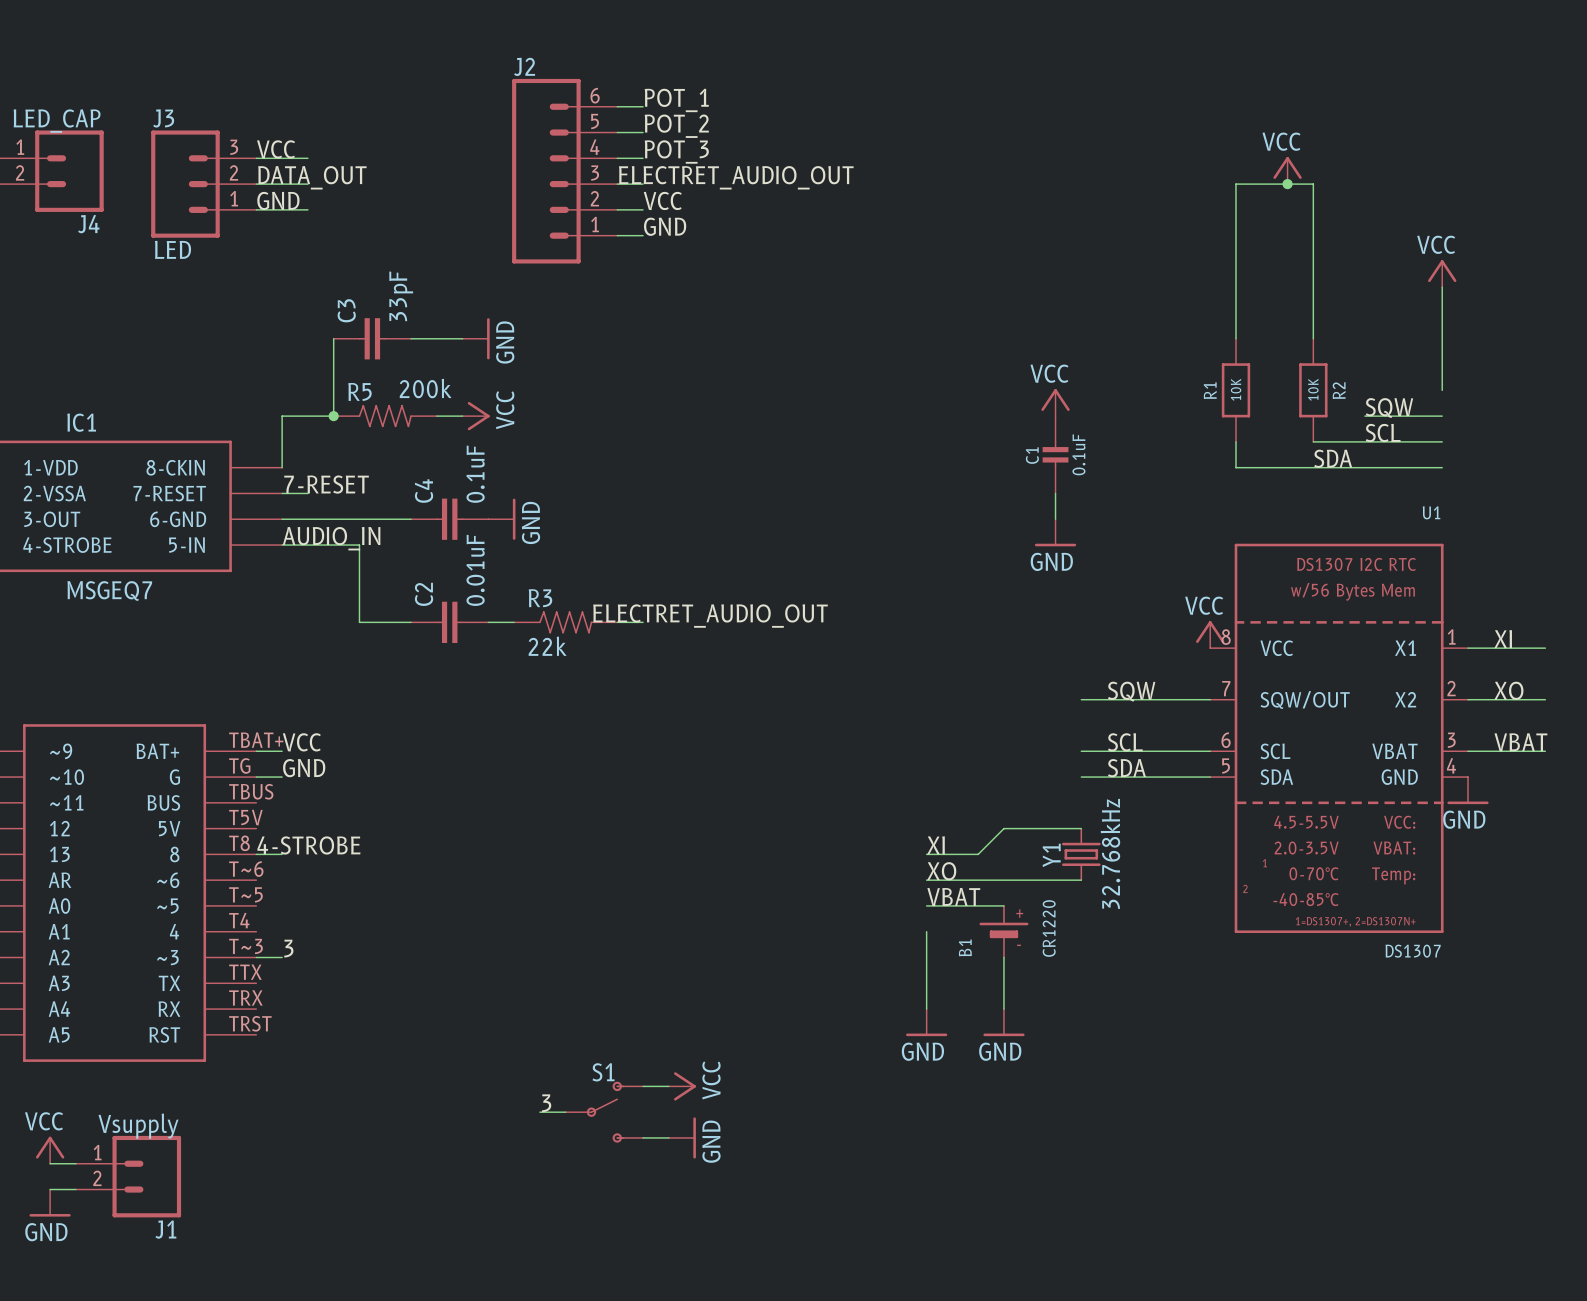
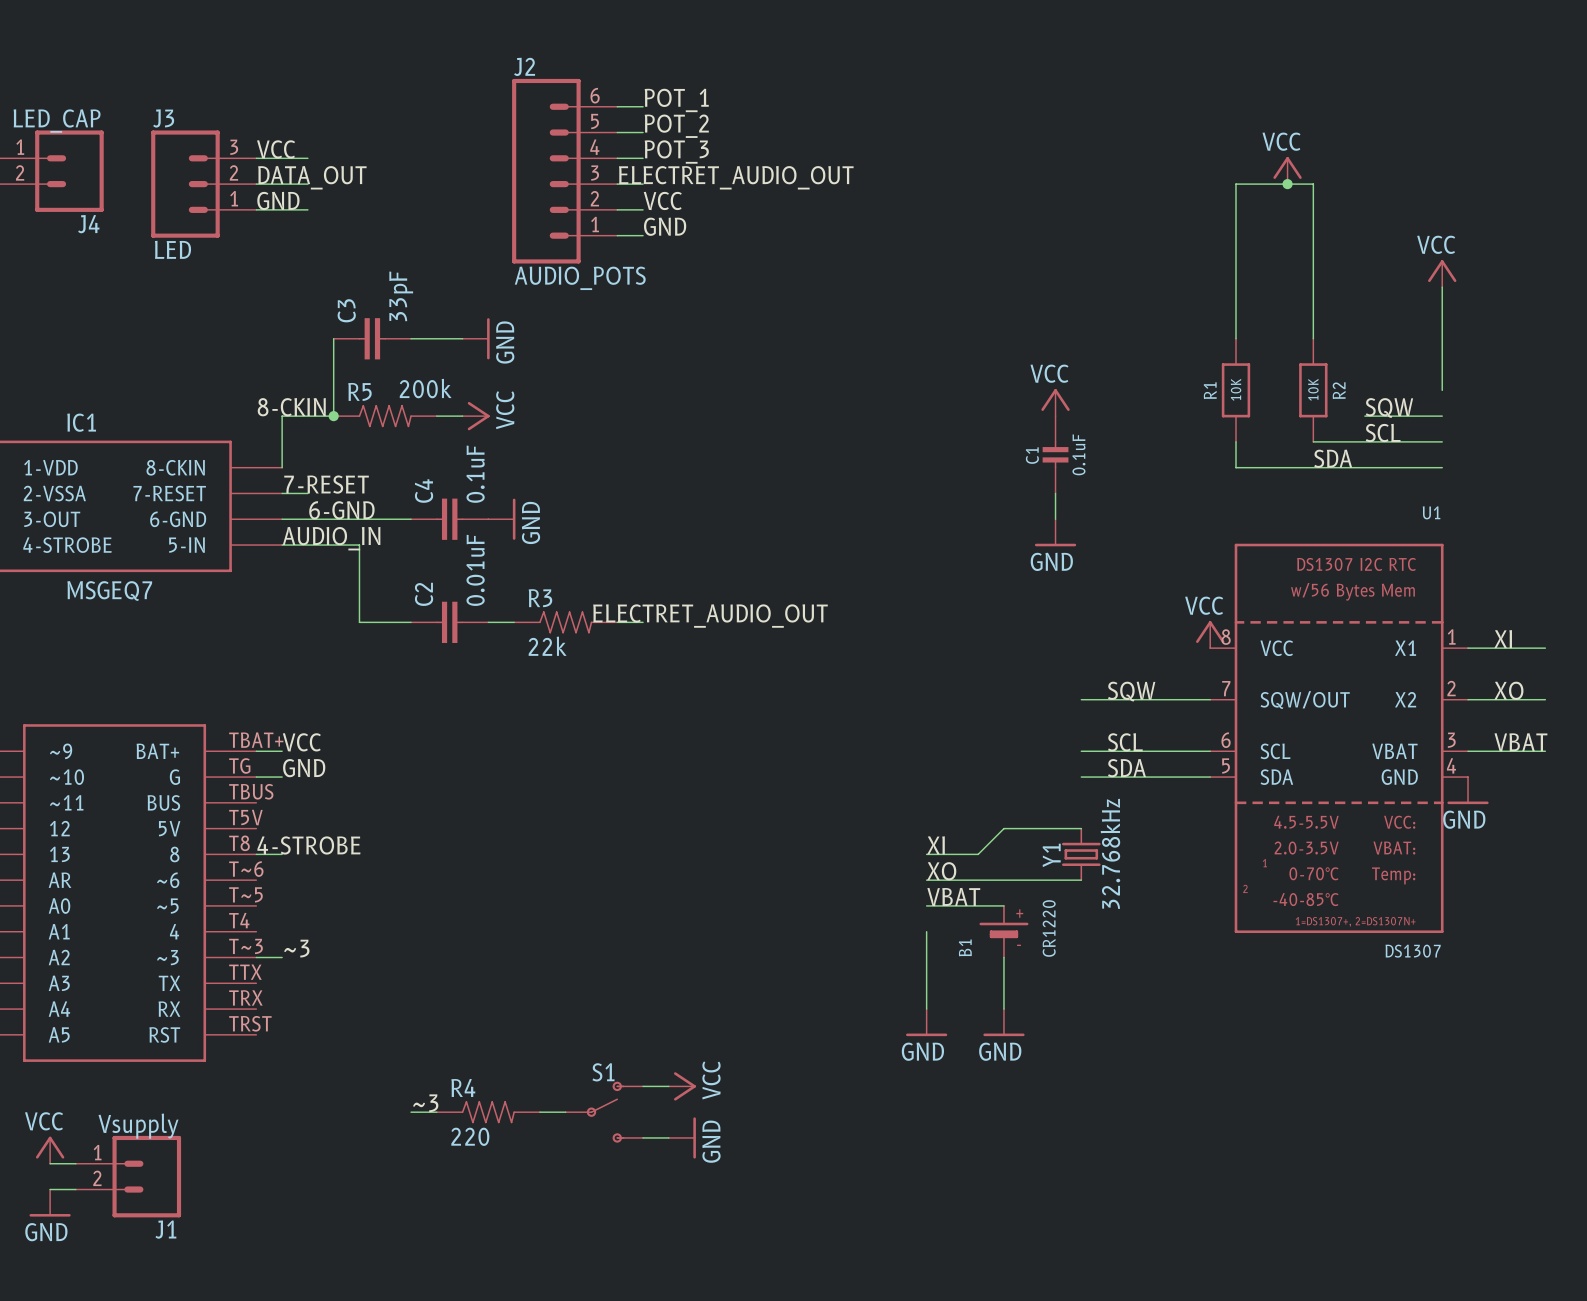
J2 value: none -> AUDIO_POTS (580, 278)
label: none -> 8-CKIN (291, 407)
label: none -> 6-GND (341, 510)
label: 3 (288, 948) -> ~3 (296, 948)
label: none -> ~3 (425, 1103)
label: 3 (546, 1103) -> none
wire: none -> (411, 1112) (436, 1112)
R4: none -> 220 (488, 1112)

